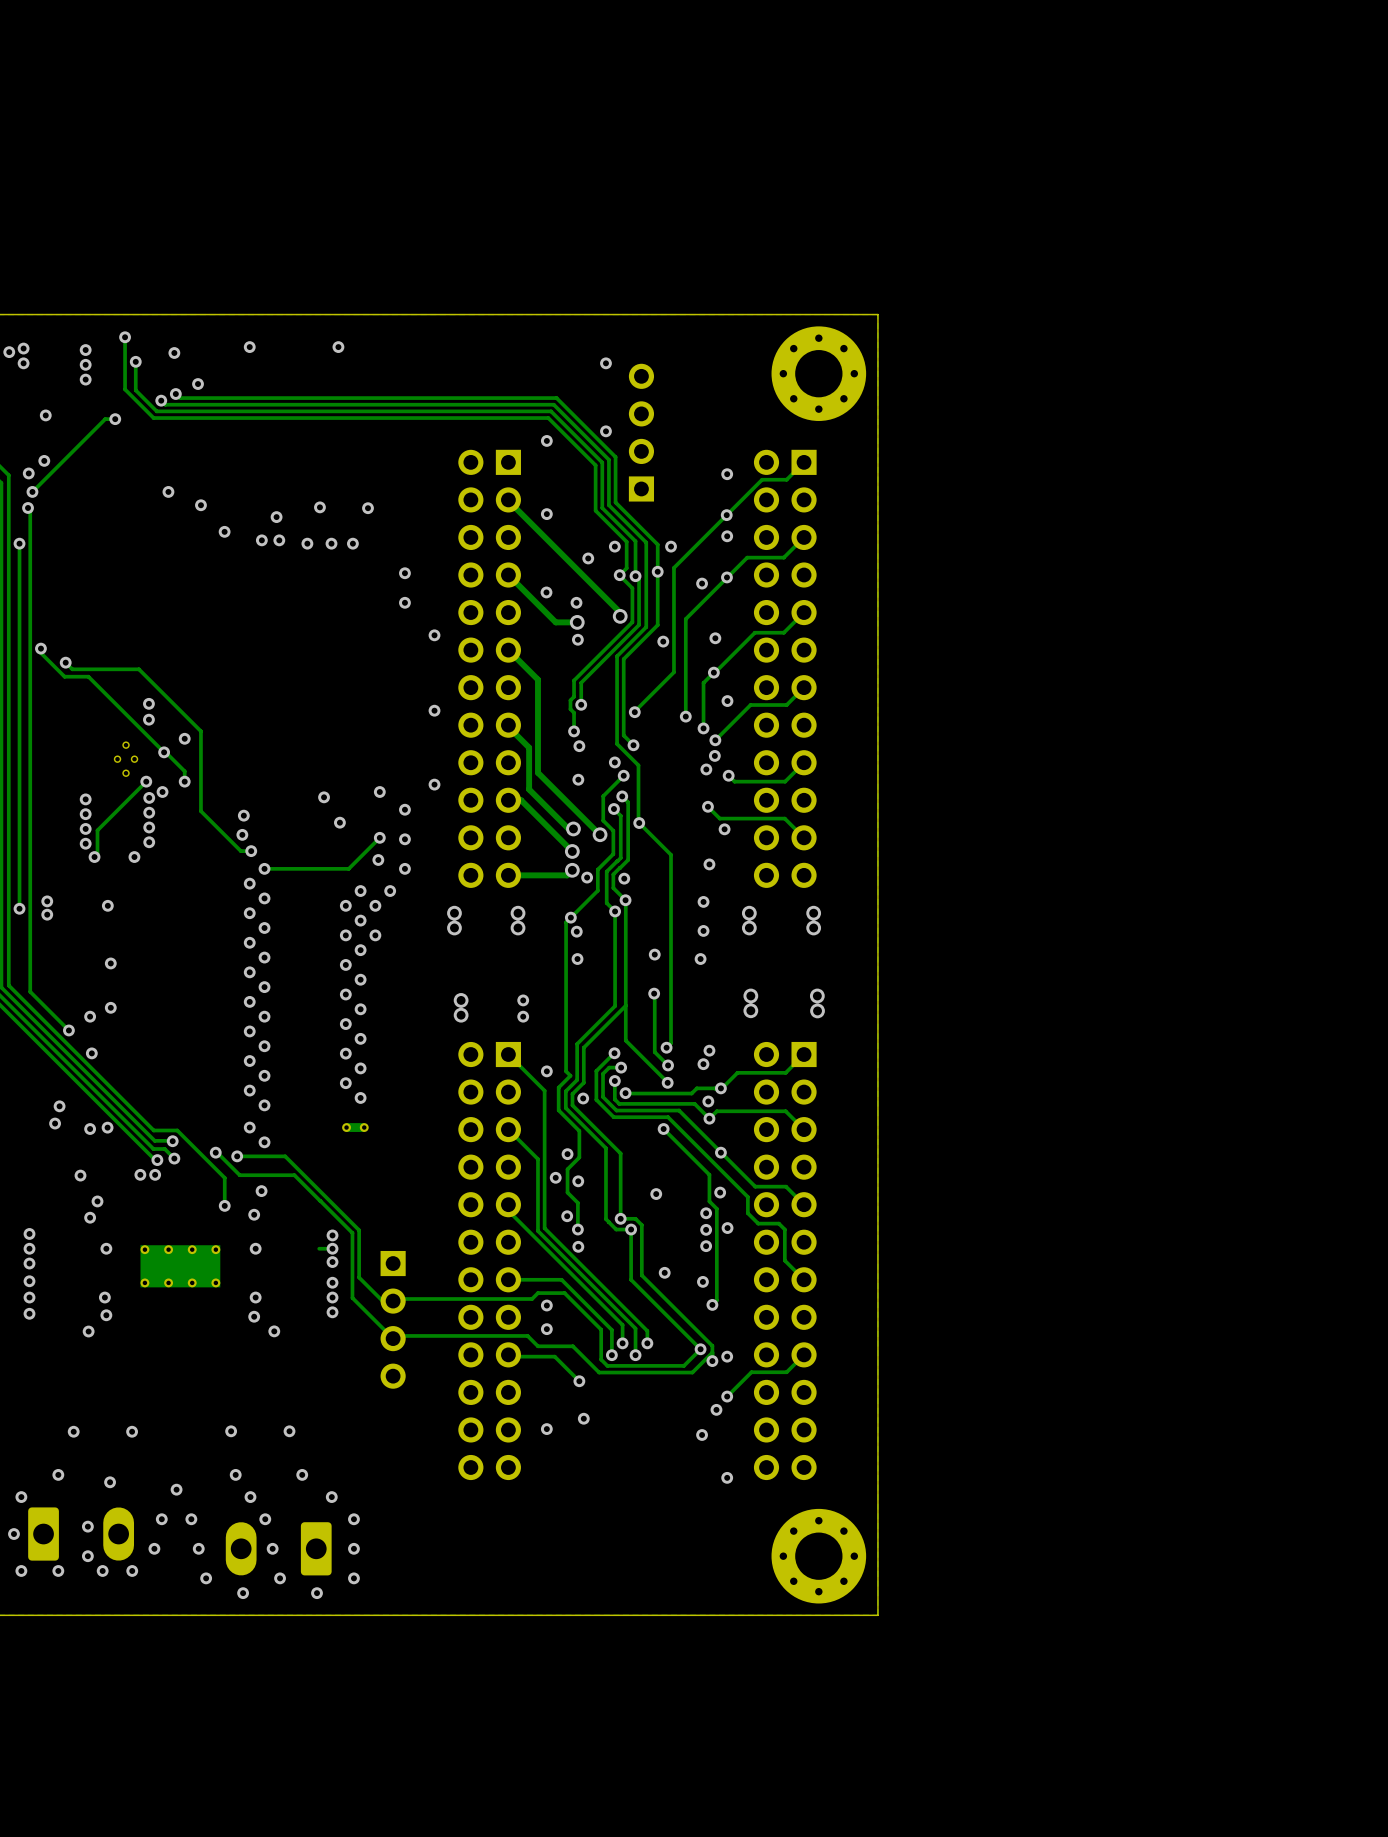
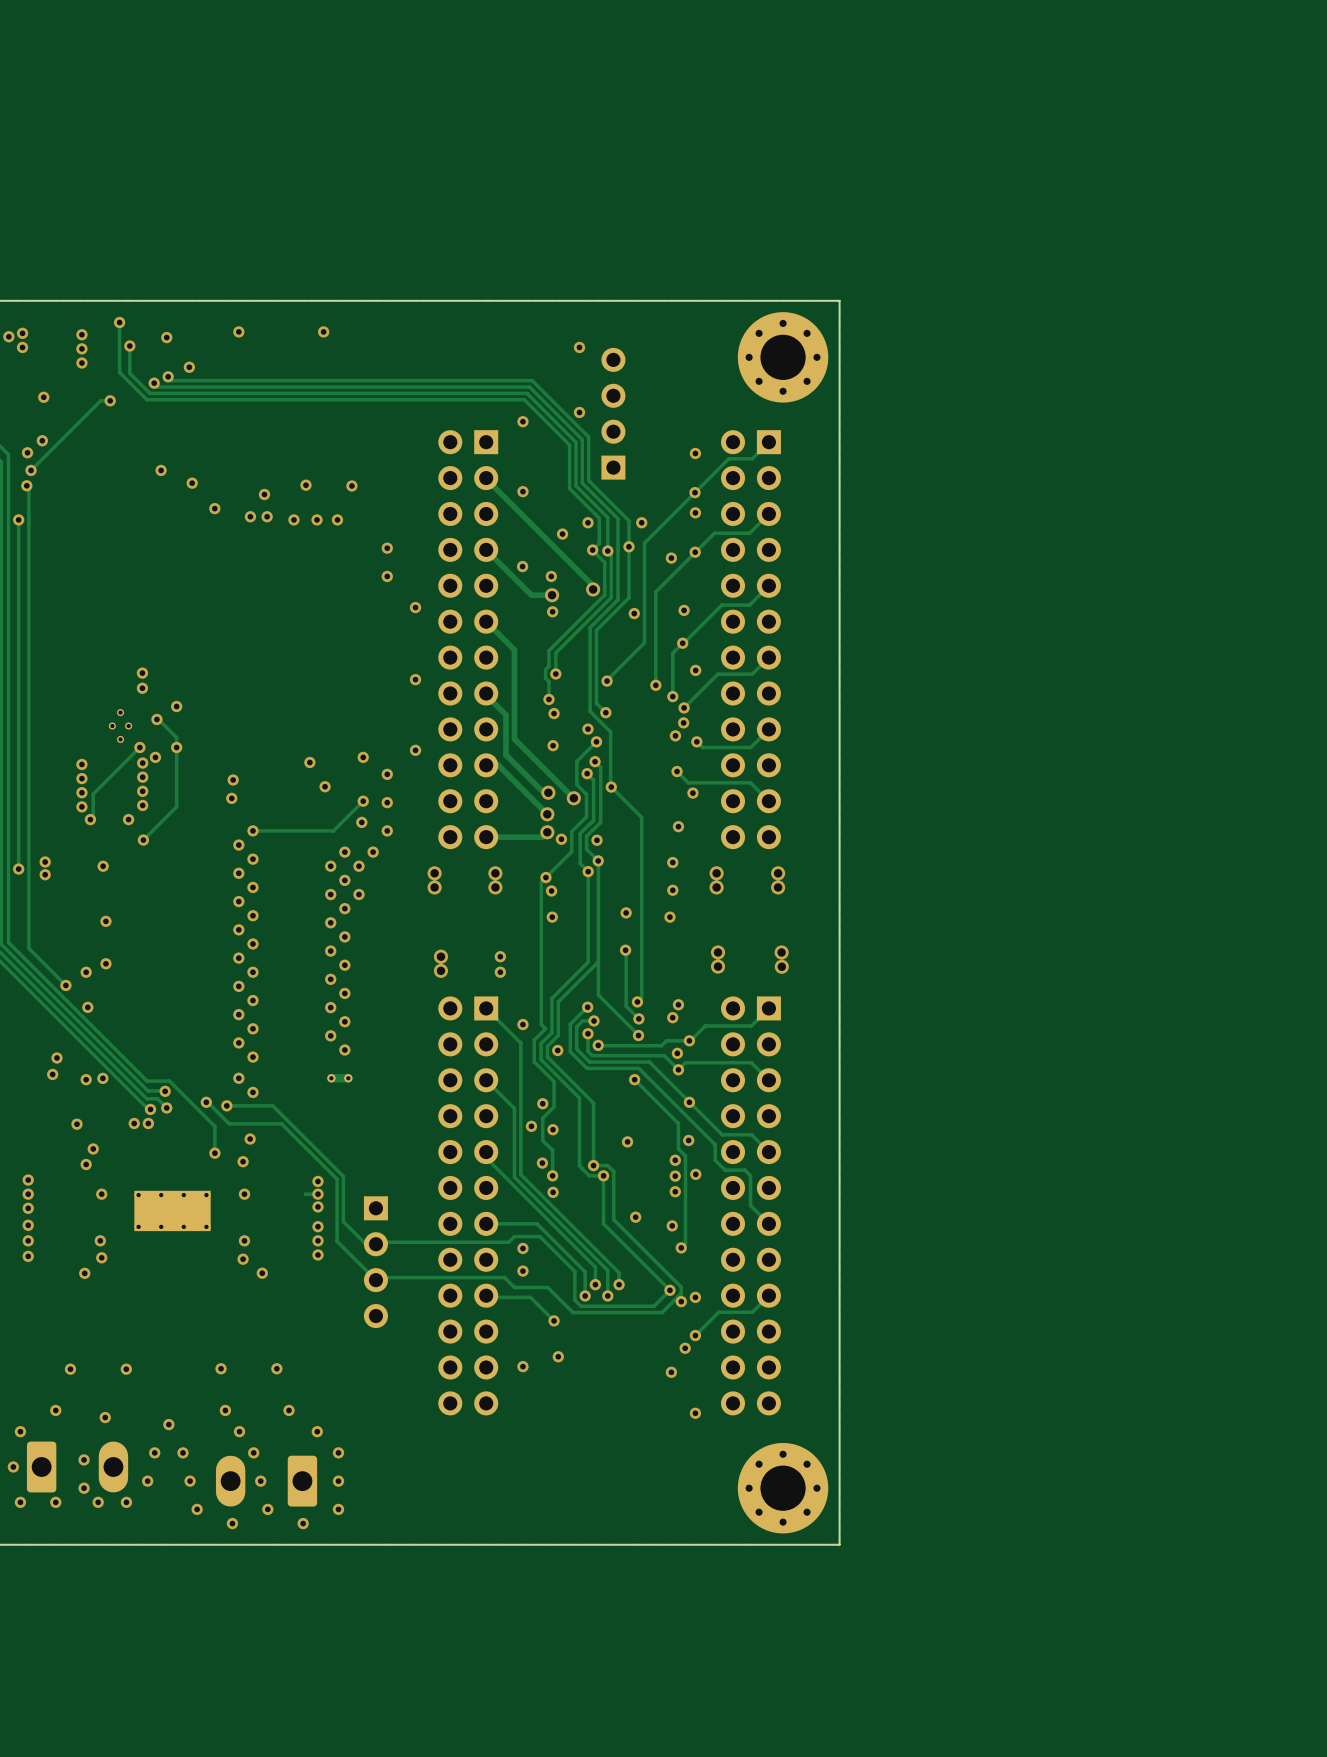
track: (40, 648) (40, 653) (64, 676) (88, 676) (164, 752) -> none
via: (40, 648) -> none
track: (65, 662) (72, 669) (138, 669) (200, 731) (200, 811) (240, 851) (251, 851) -> none
via: (65, 662) -> none
track: none -> (176, 747) (176, 806) (143, 840)
via: (251, 851) -> none
via: none -> (143, 840)

